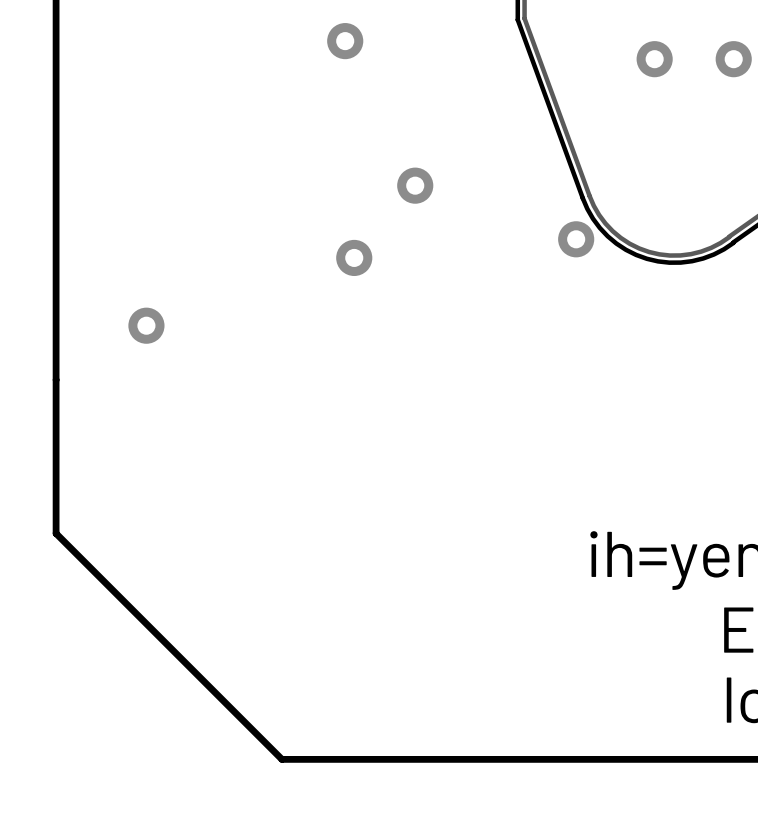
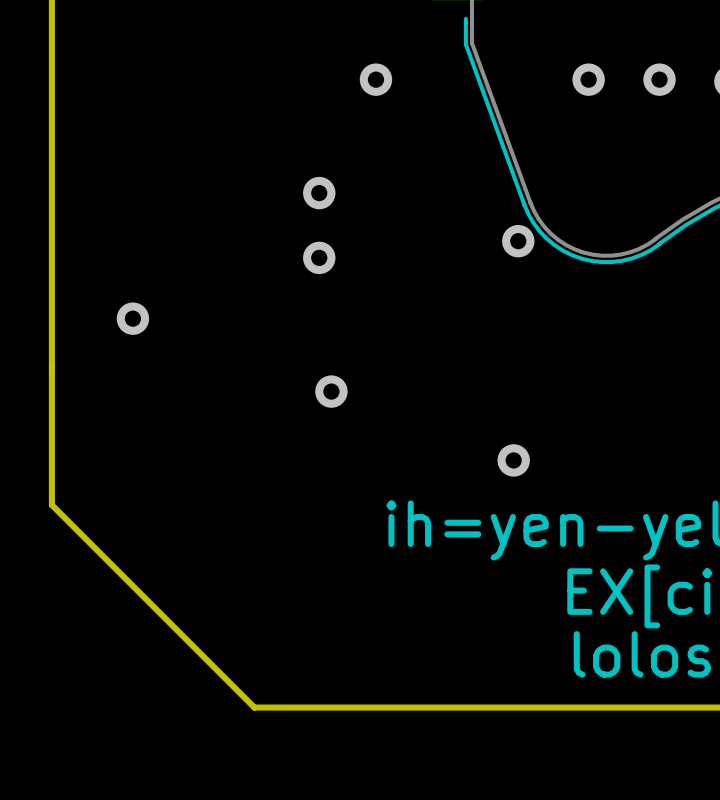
via: (345, 41) -> none
via: none -> (375, 79)
via position: (415, 185) -> (319, 193)
via: none -> (331, 391)
via: none -> (513, 460)

